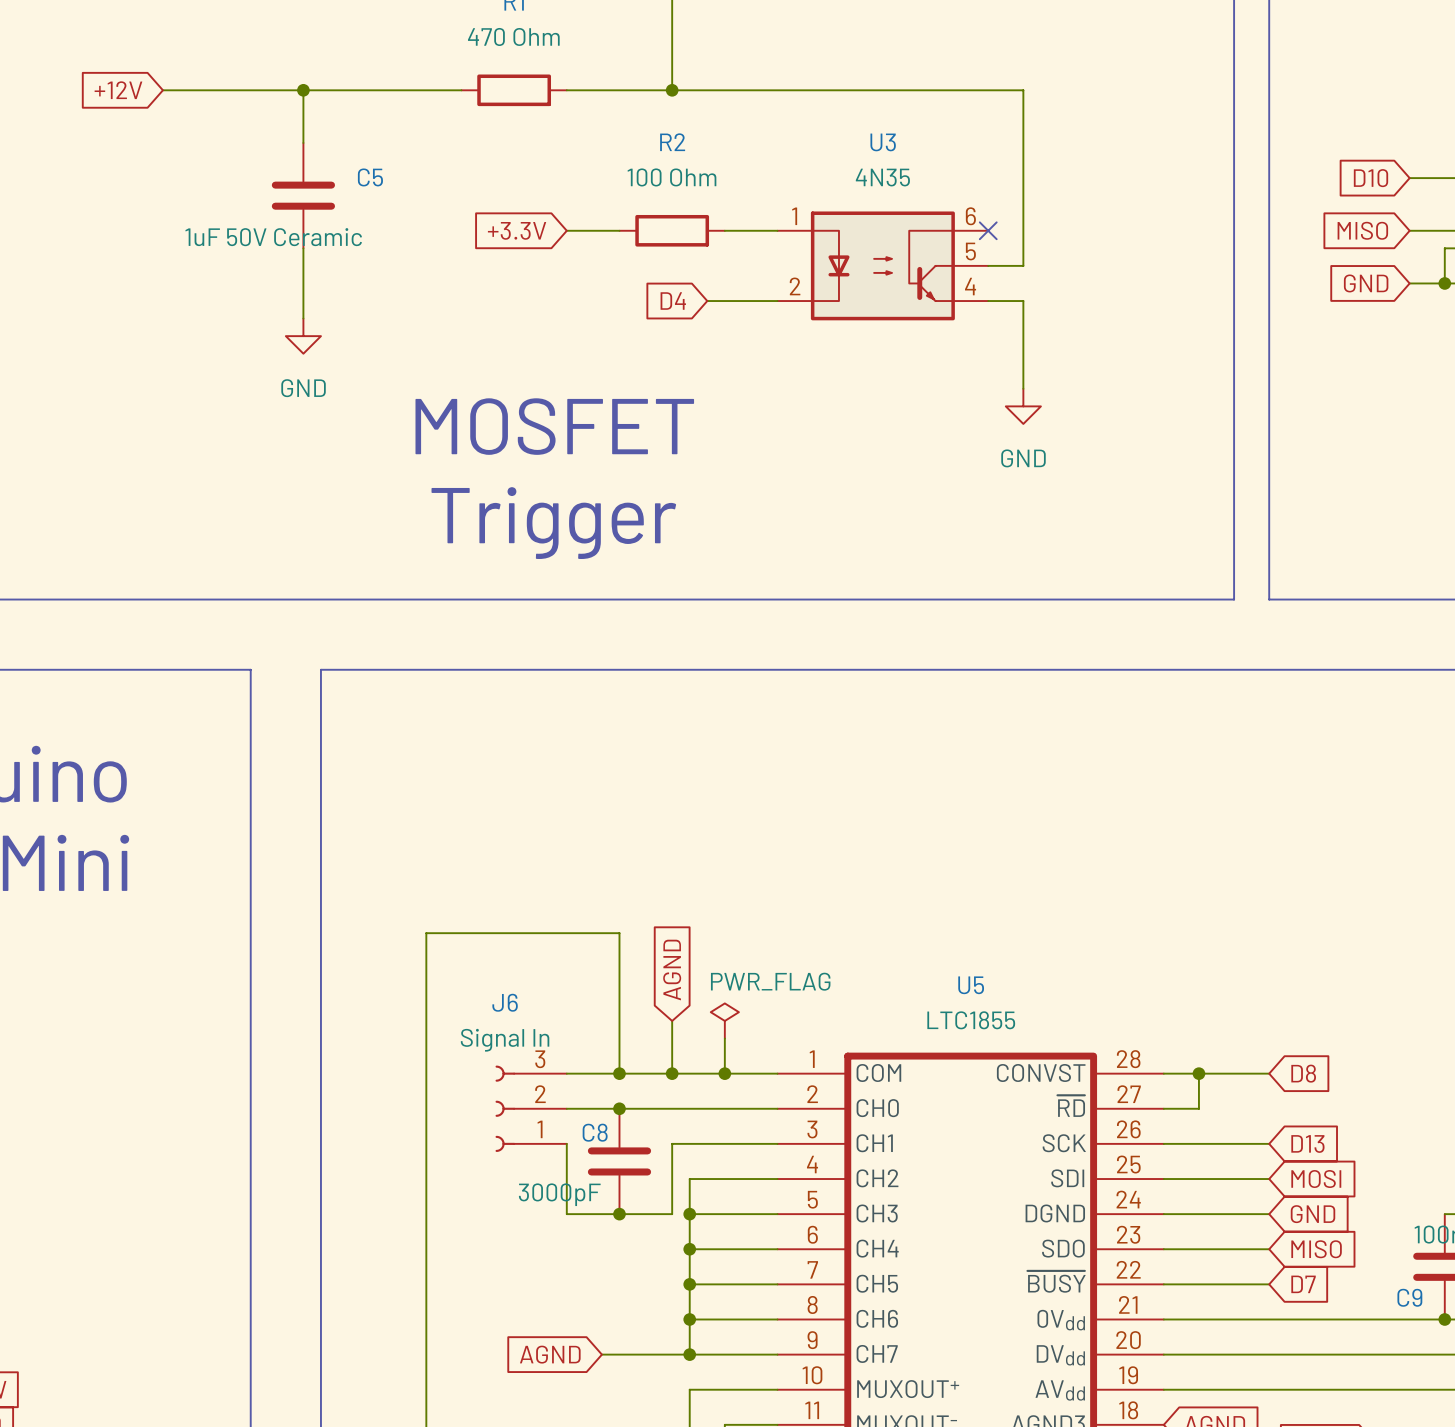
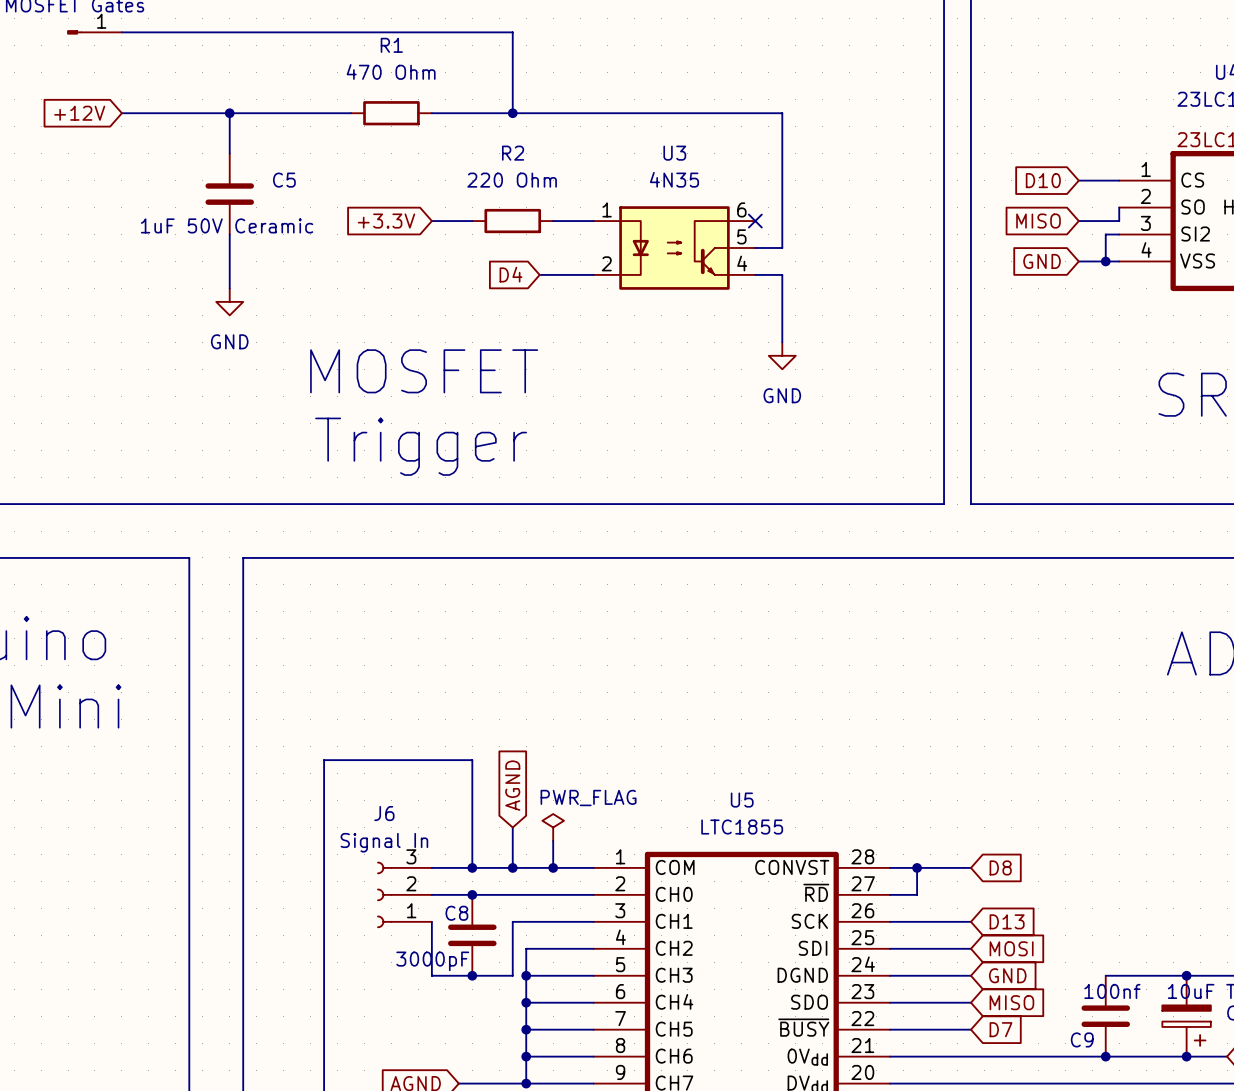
R2 value: 100 Ohm (671, 177) -> 220 Ohm (512, 180)

